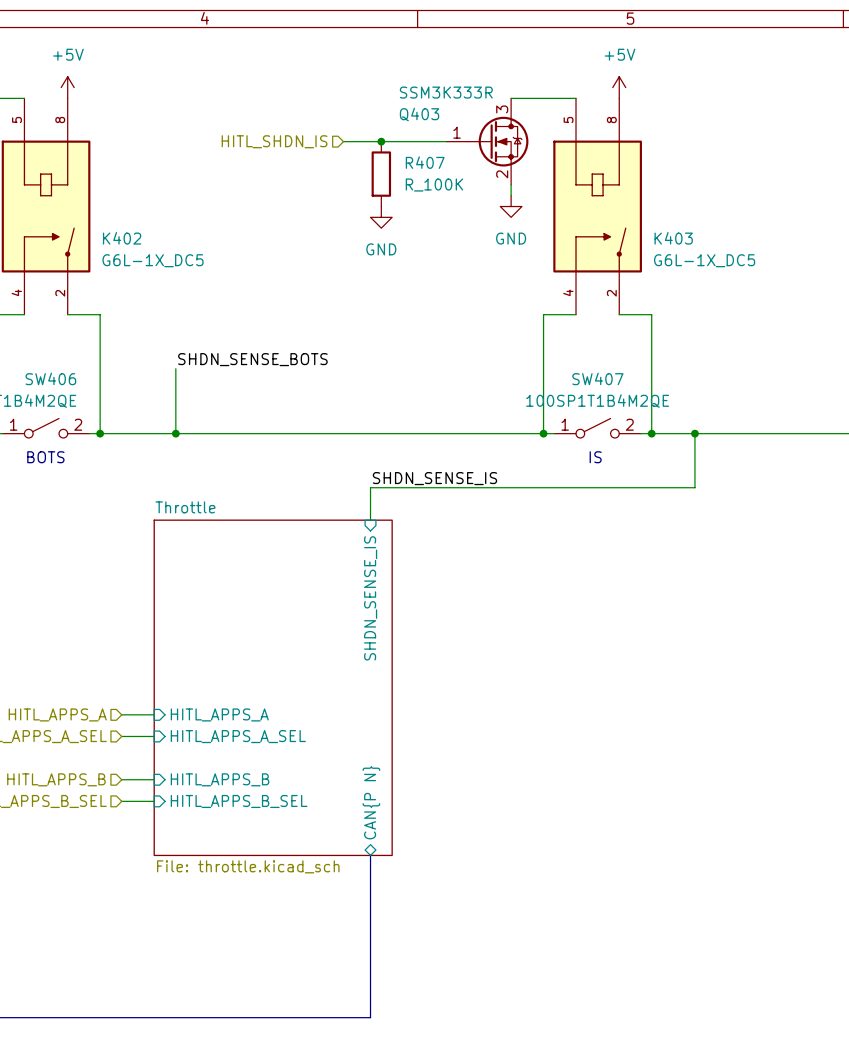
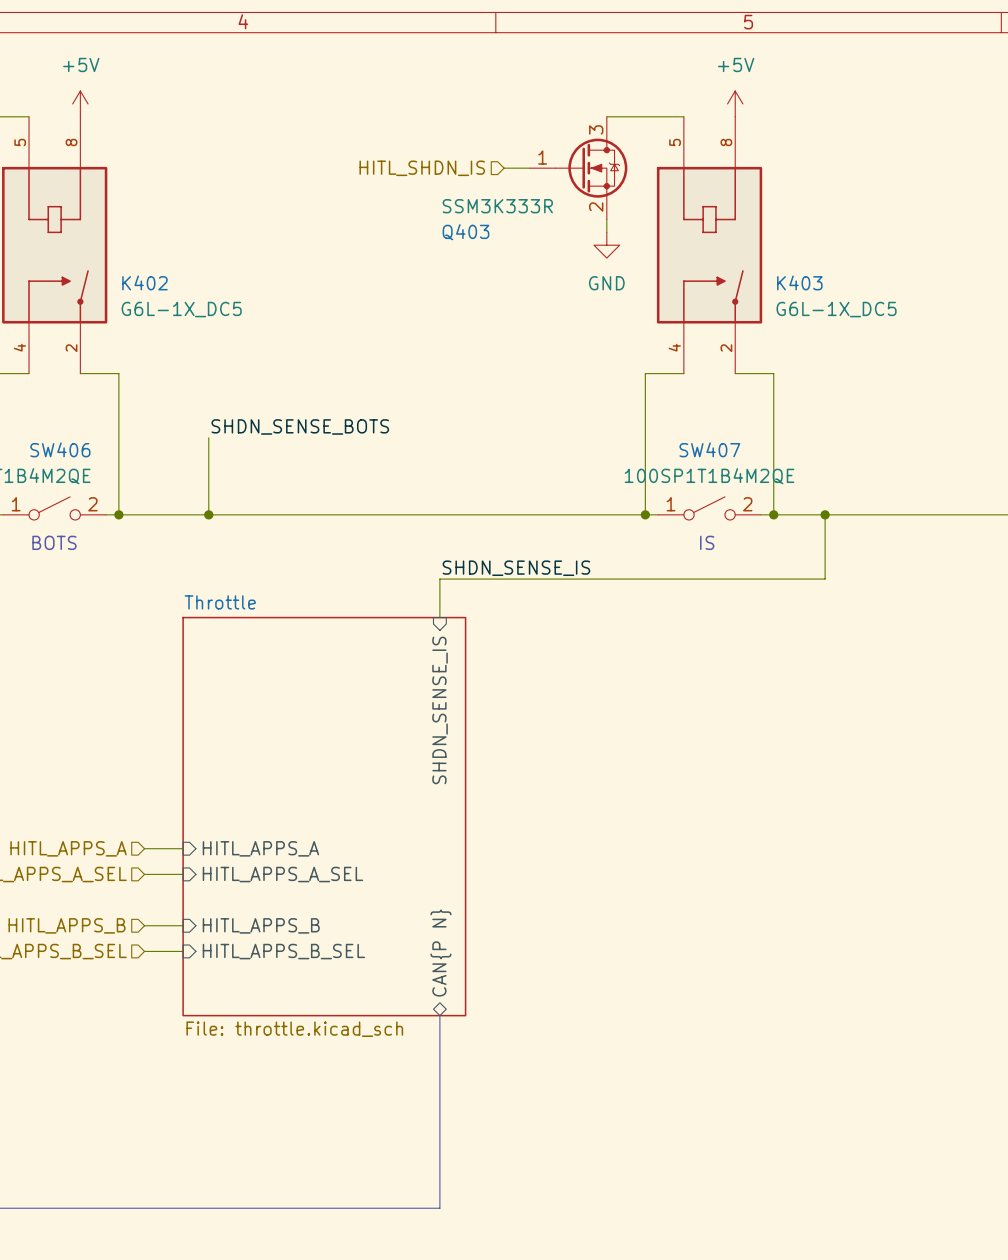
Q403 value position: SSM3K333R (446, 92) -> SSM3K333R (497, 206)
Q403 name position: Q403 (419, 114) -> Q403 (465, 232)
hierarchical label position: HITL_SHDN_IS (274, 141) -> HITL_SHDN_IS (422, 168)
wire: (343, 141) (424, 141) -> none
junction: (381, 141) -> none
R407: R_100K (381, 174) -> none
power symbol: GND (381, 217) -> none

